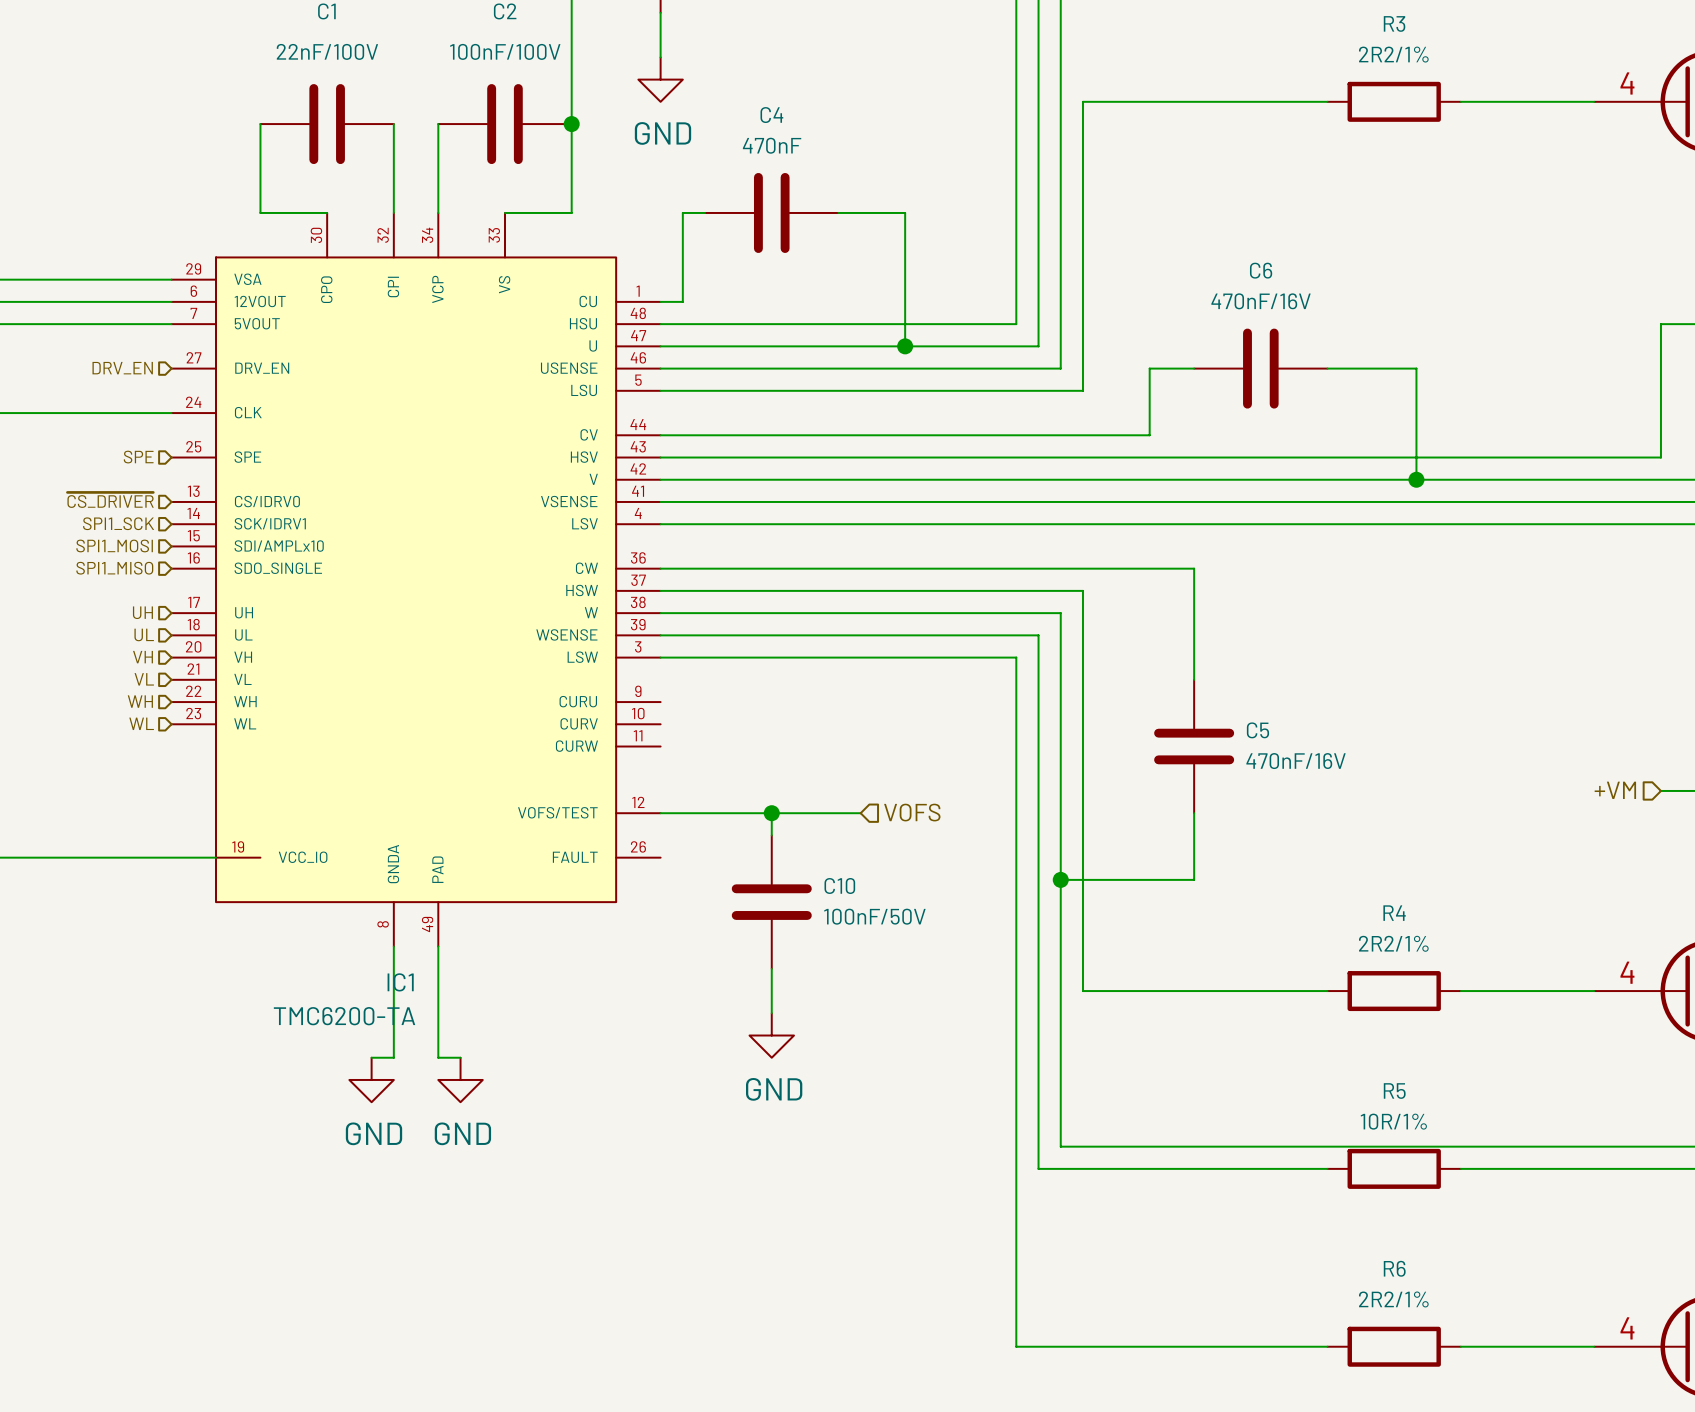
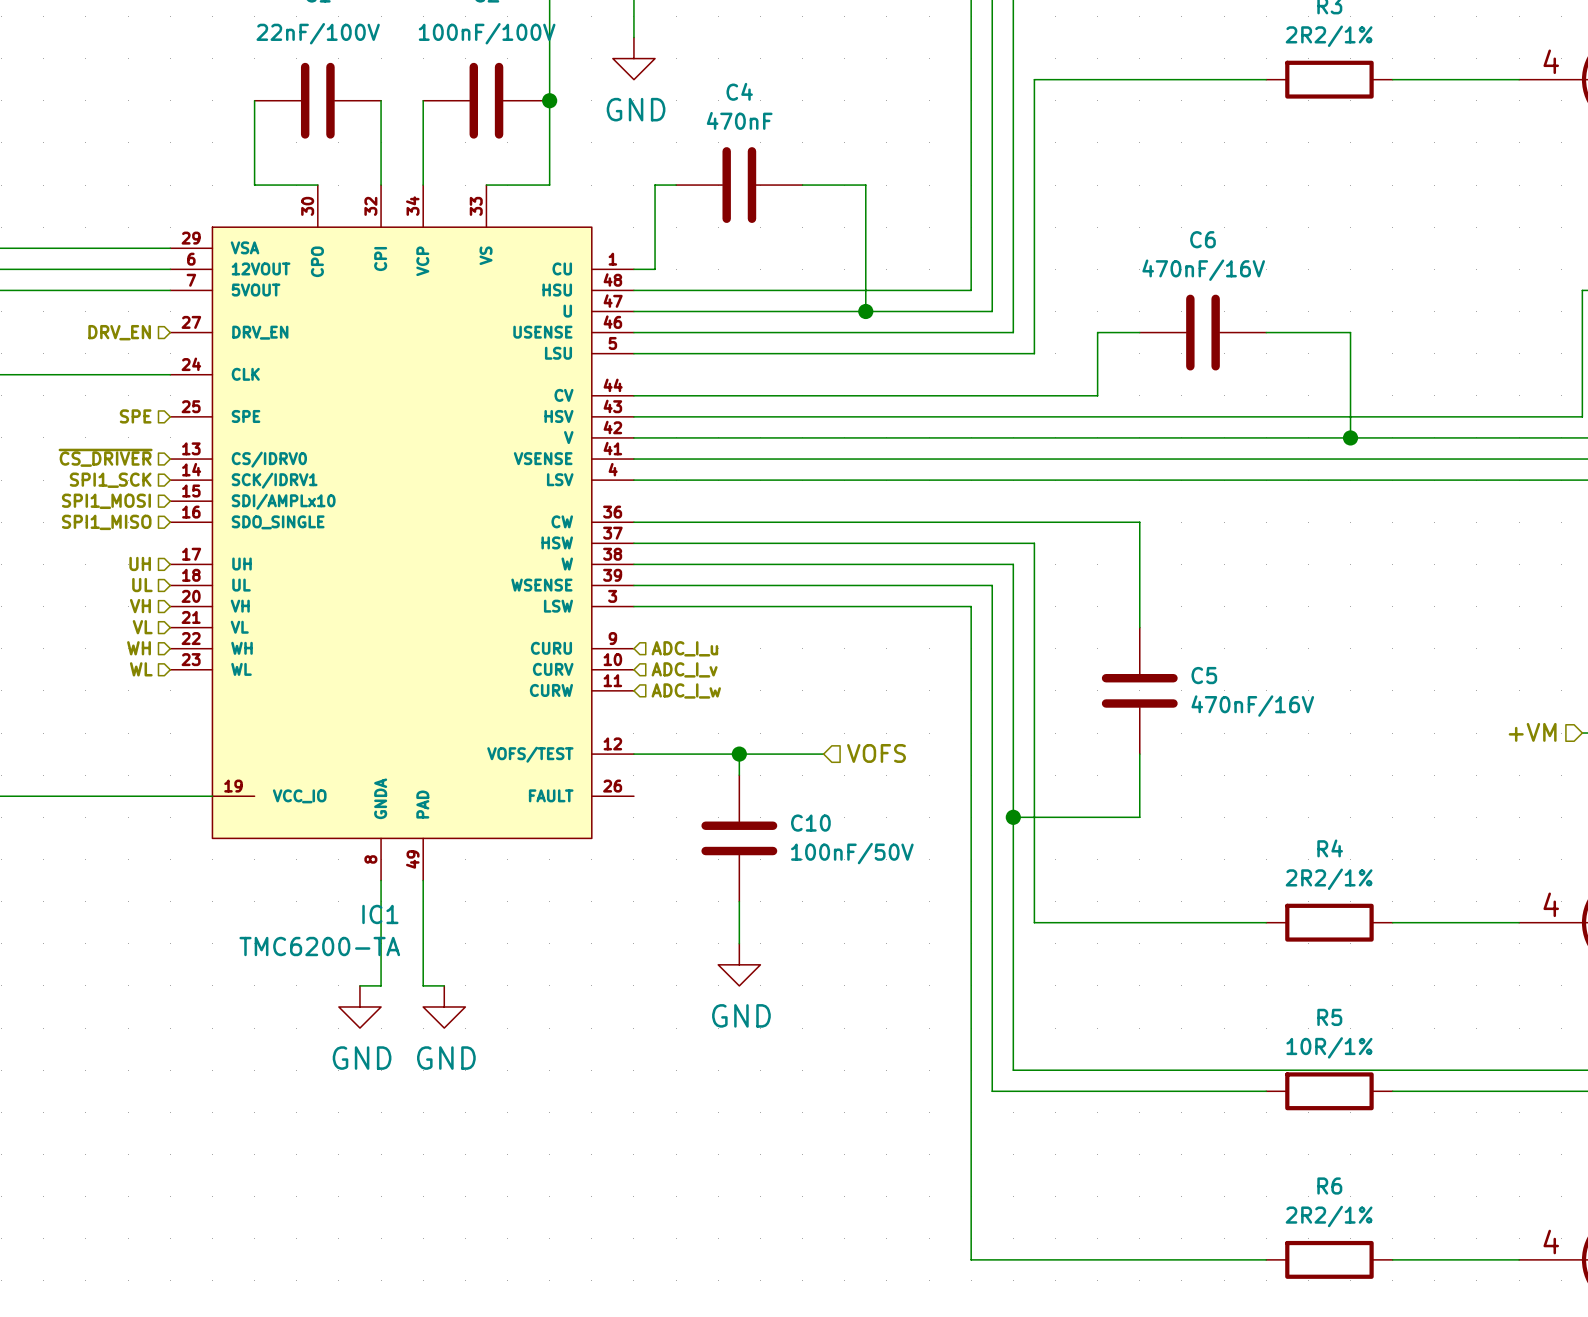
hierarchical label: none -> ADC_I_u (684, 648)
hierarchical label: none -> ADC_I_v (684, 669)
hierarchical label: none -> ADC_I_w (686, 690)

